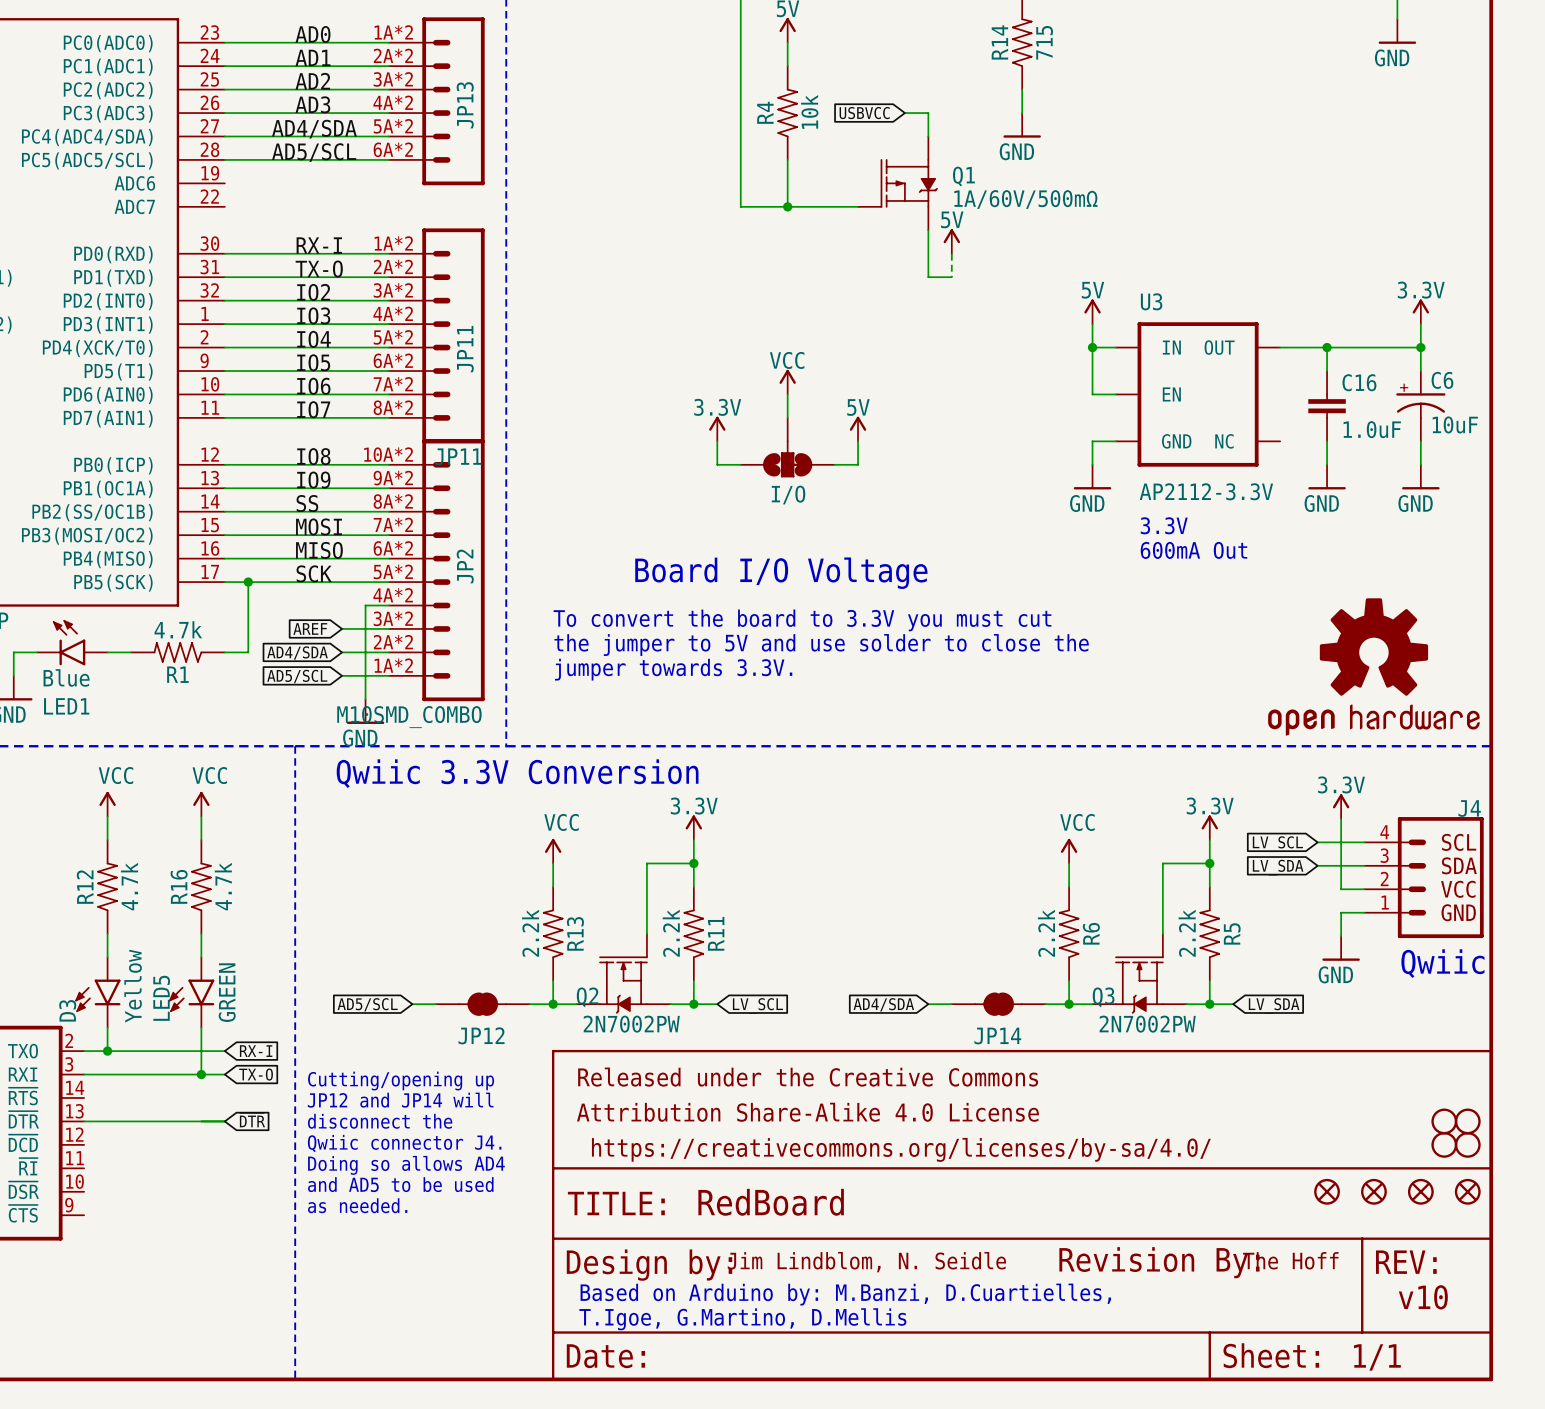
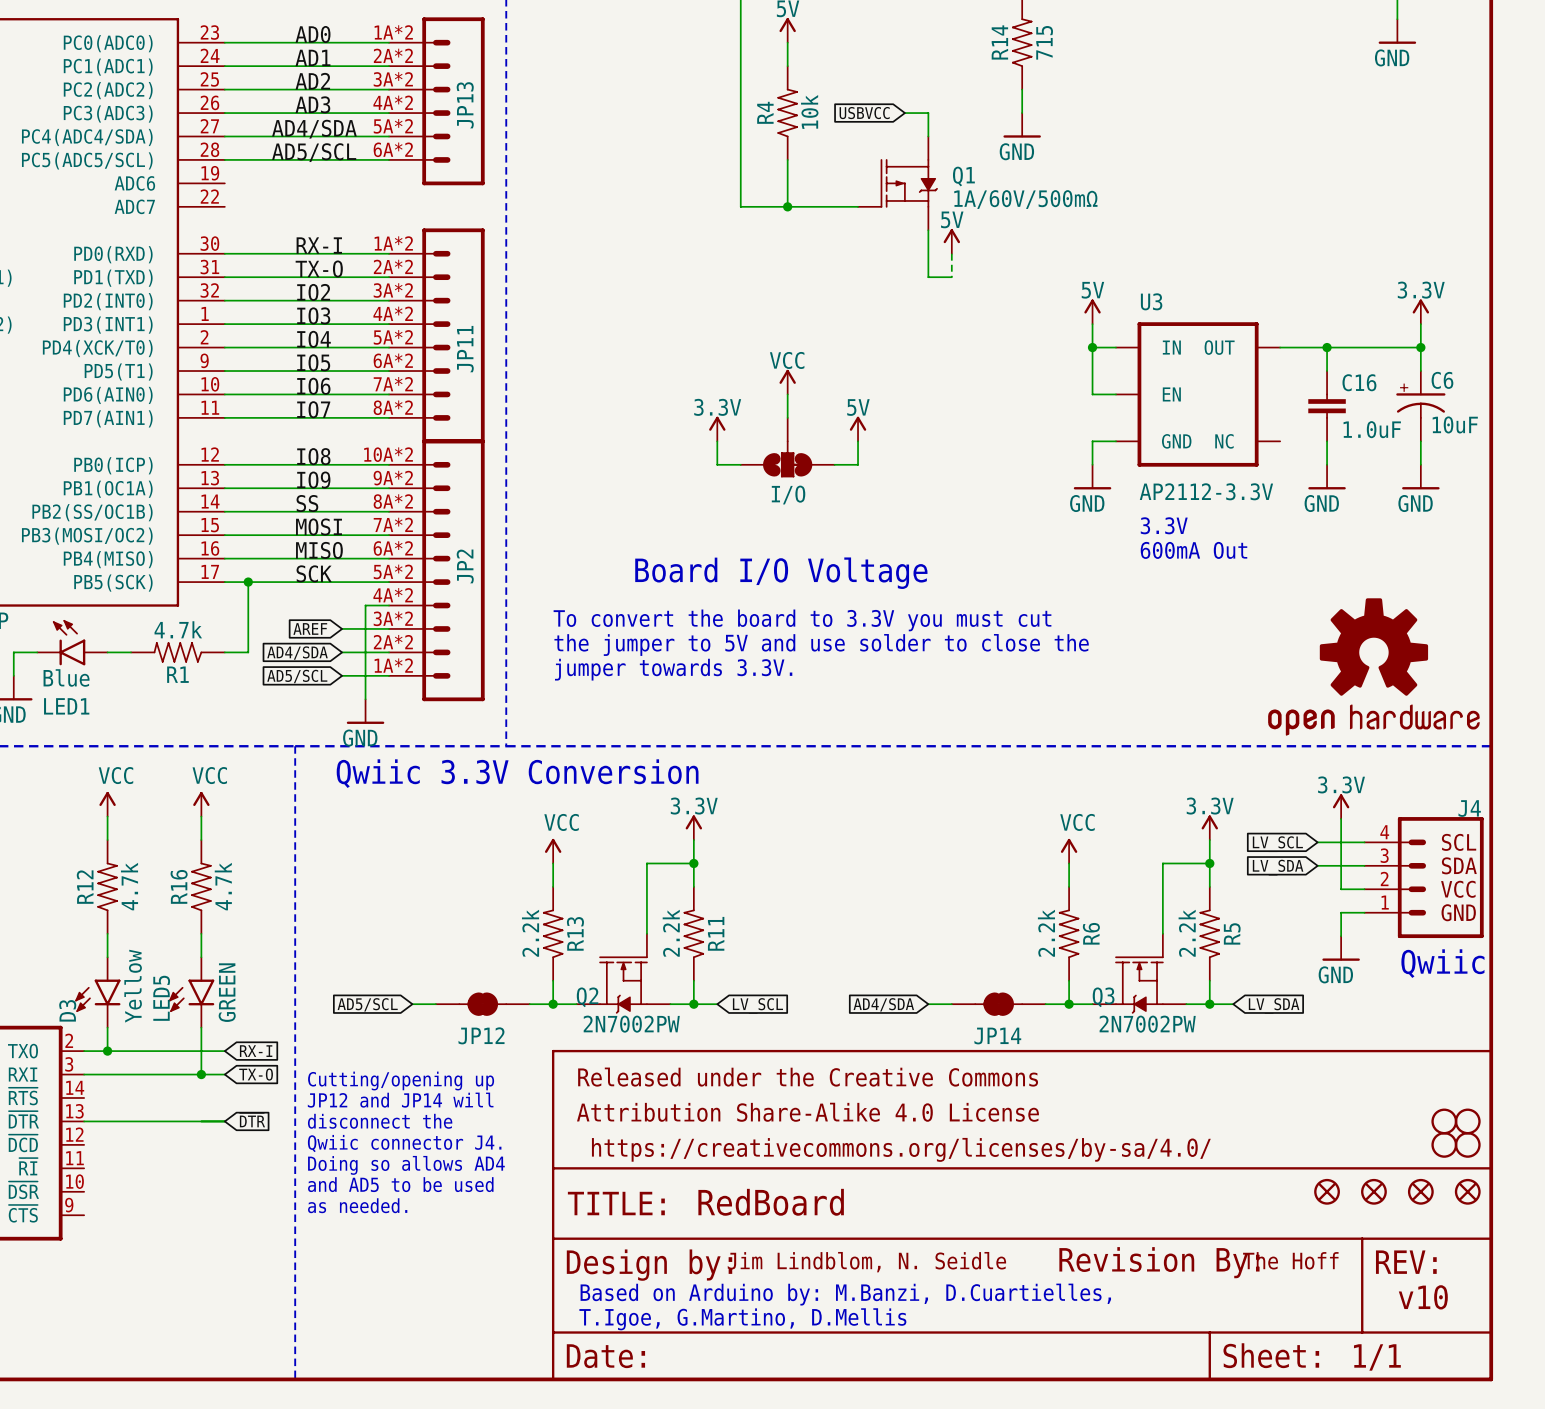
JP11 name: JP11 (458, 456) -> none
JP2 value: M10SMD_COMBO (409, 717) -> none

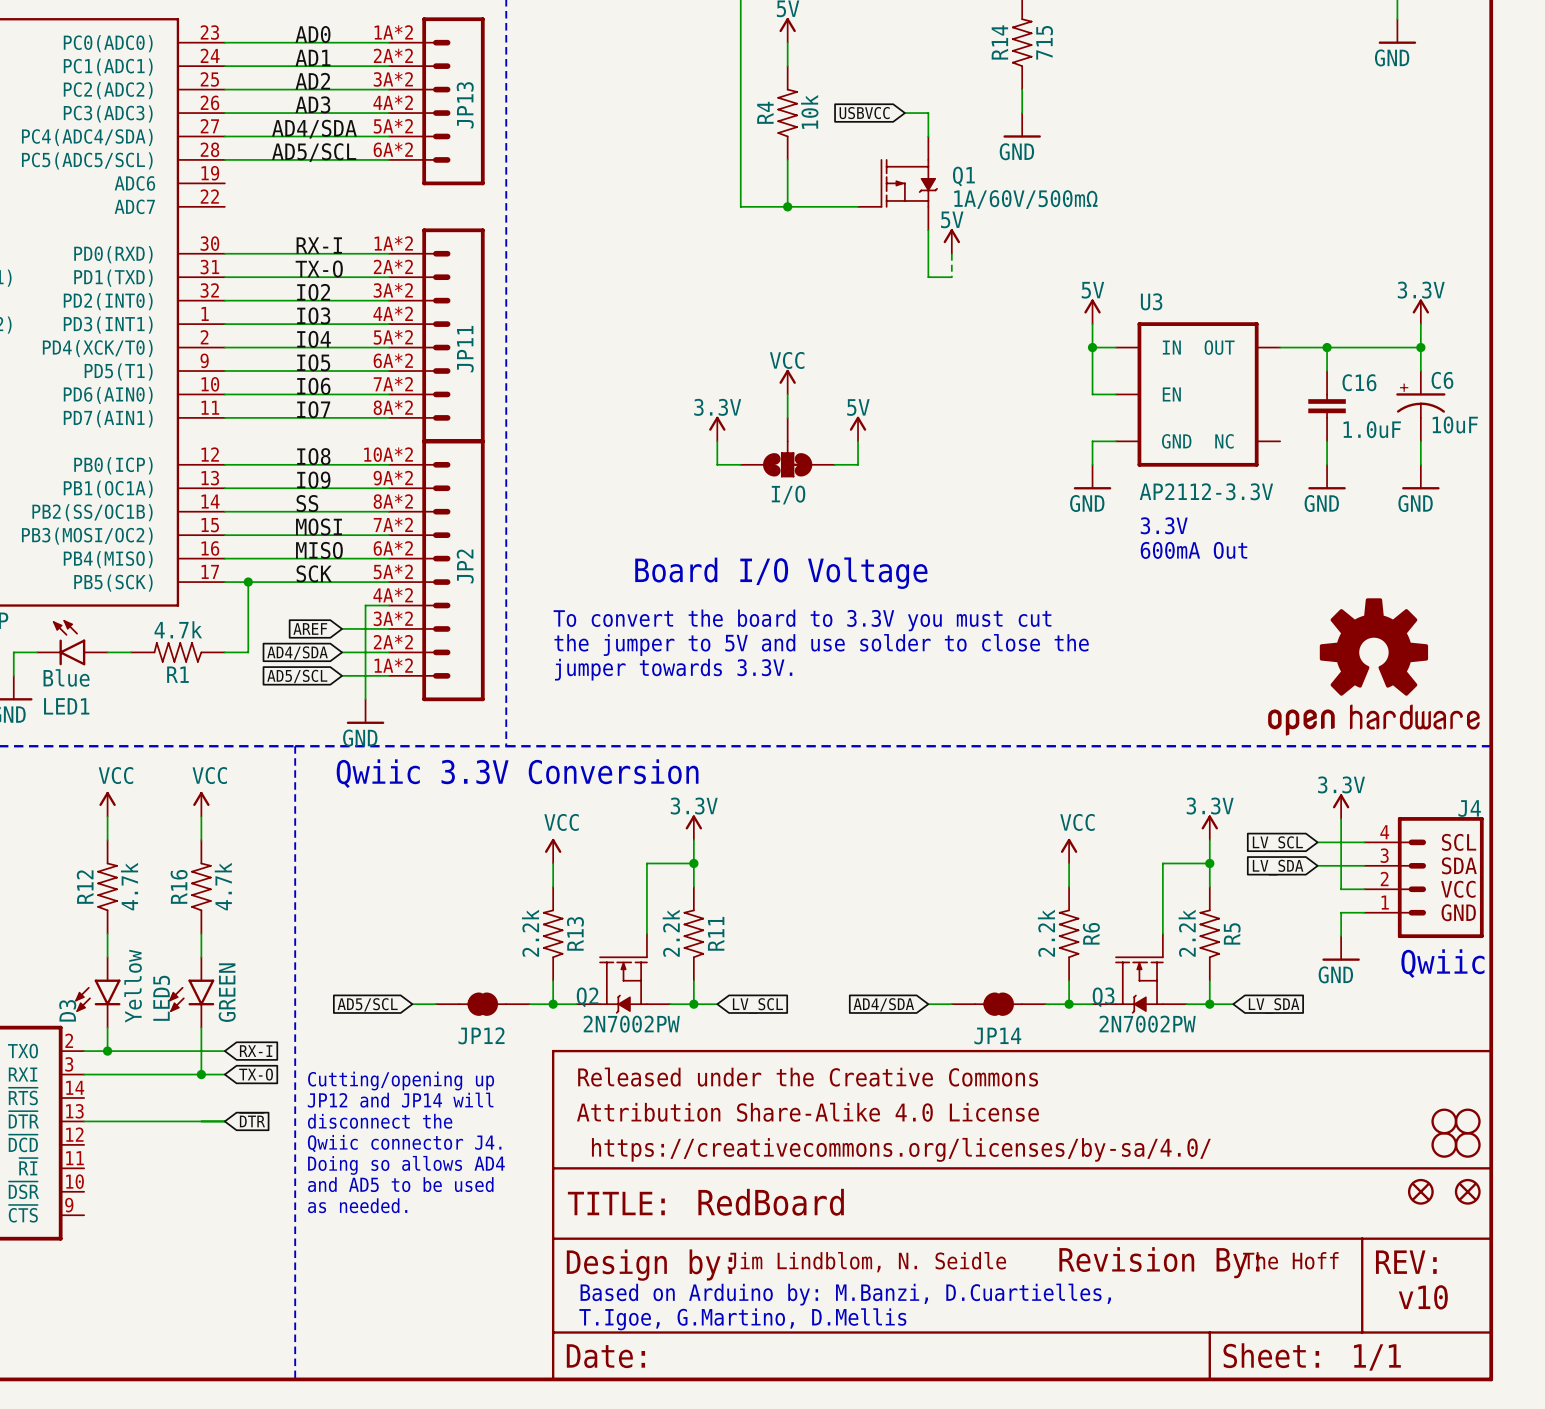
part: (1327, 1191) -> none
part: (1373, 1191) -> none

